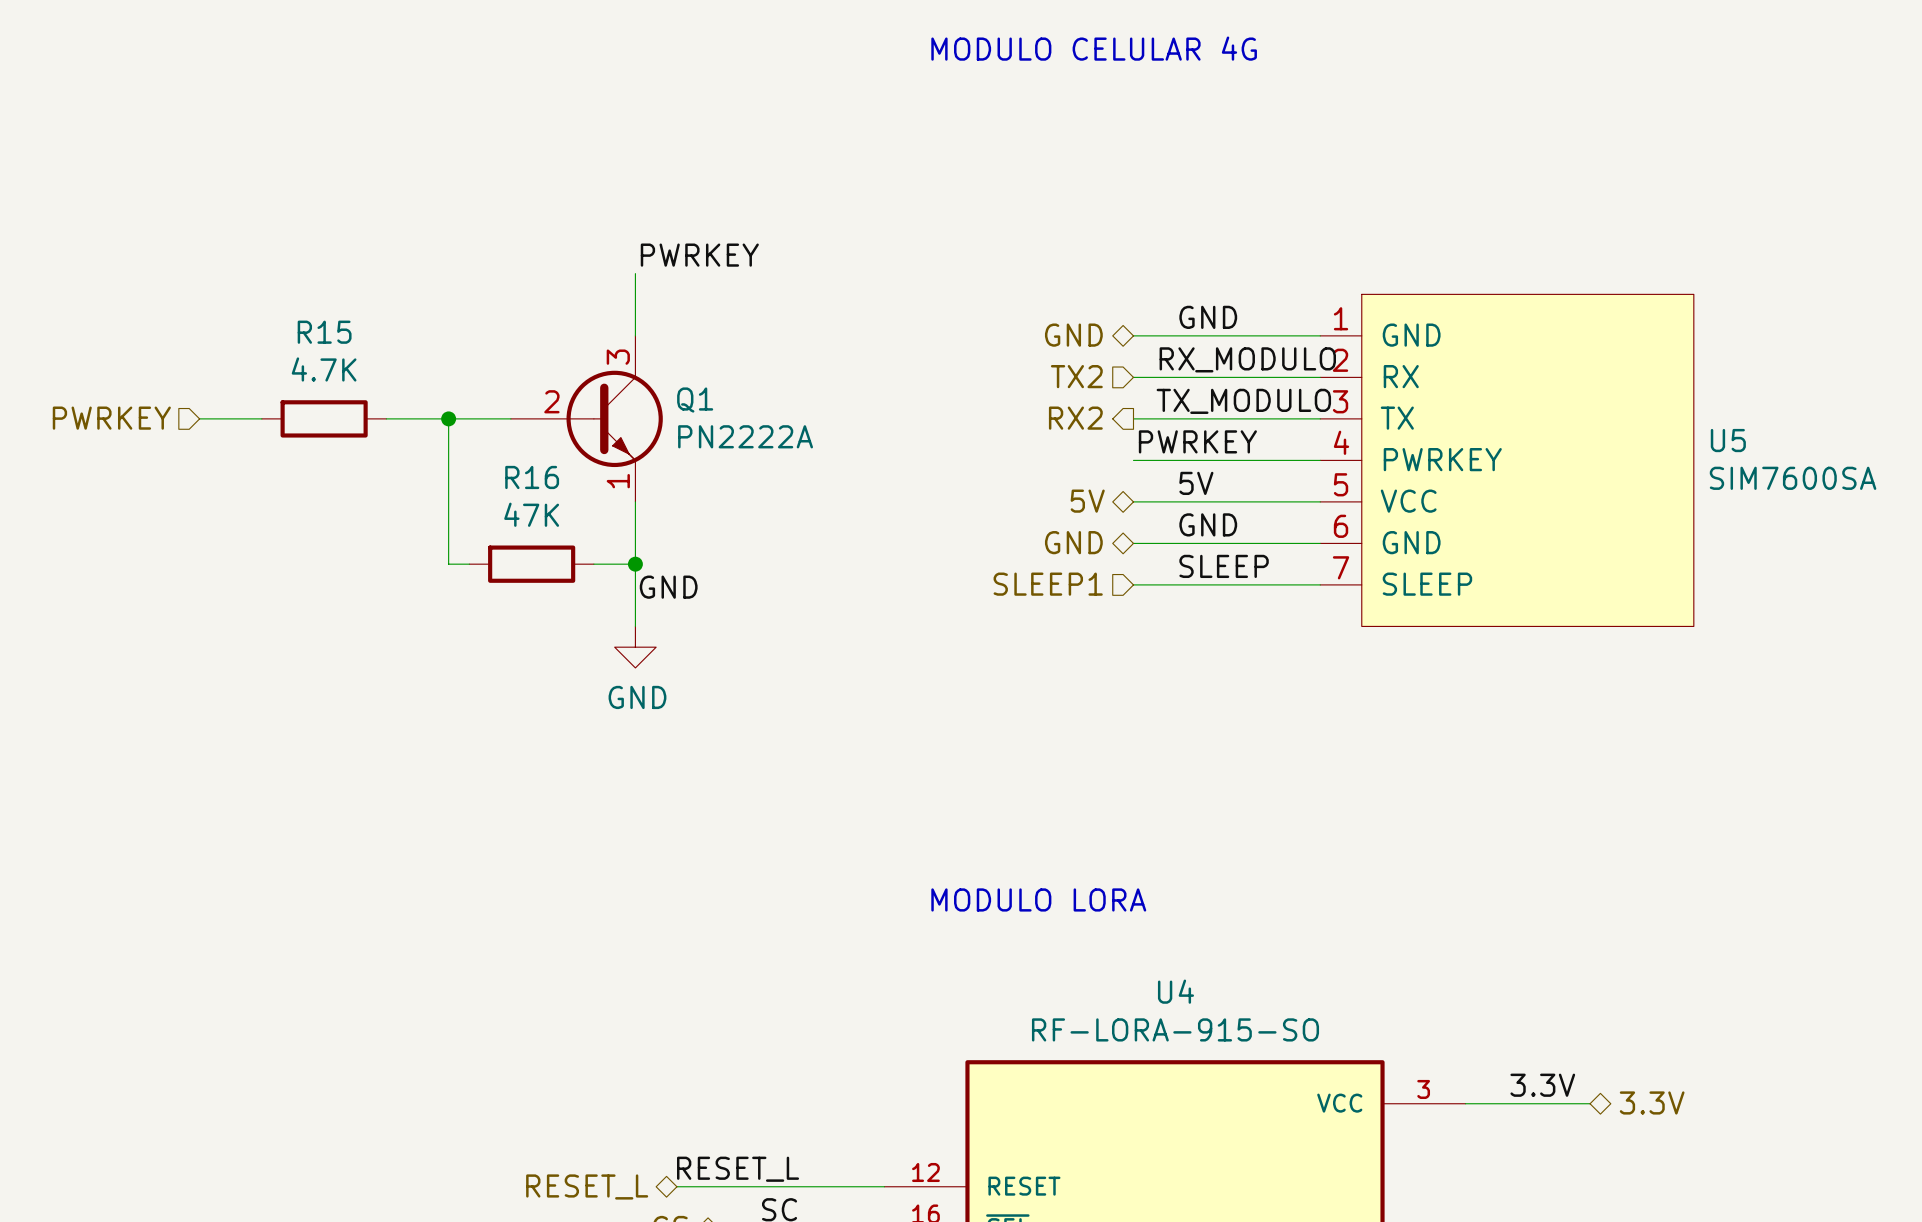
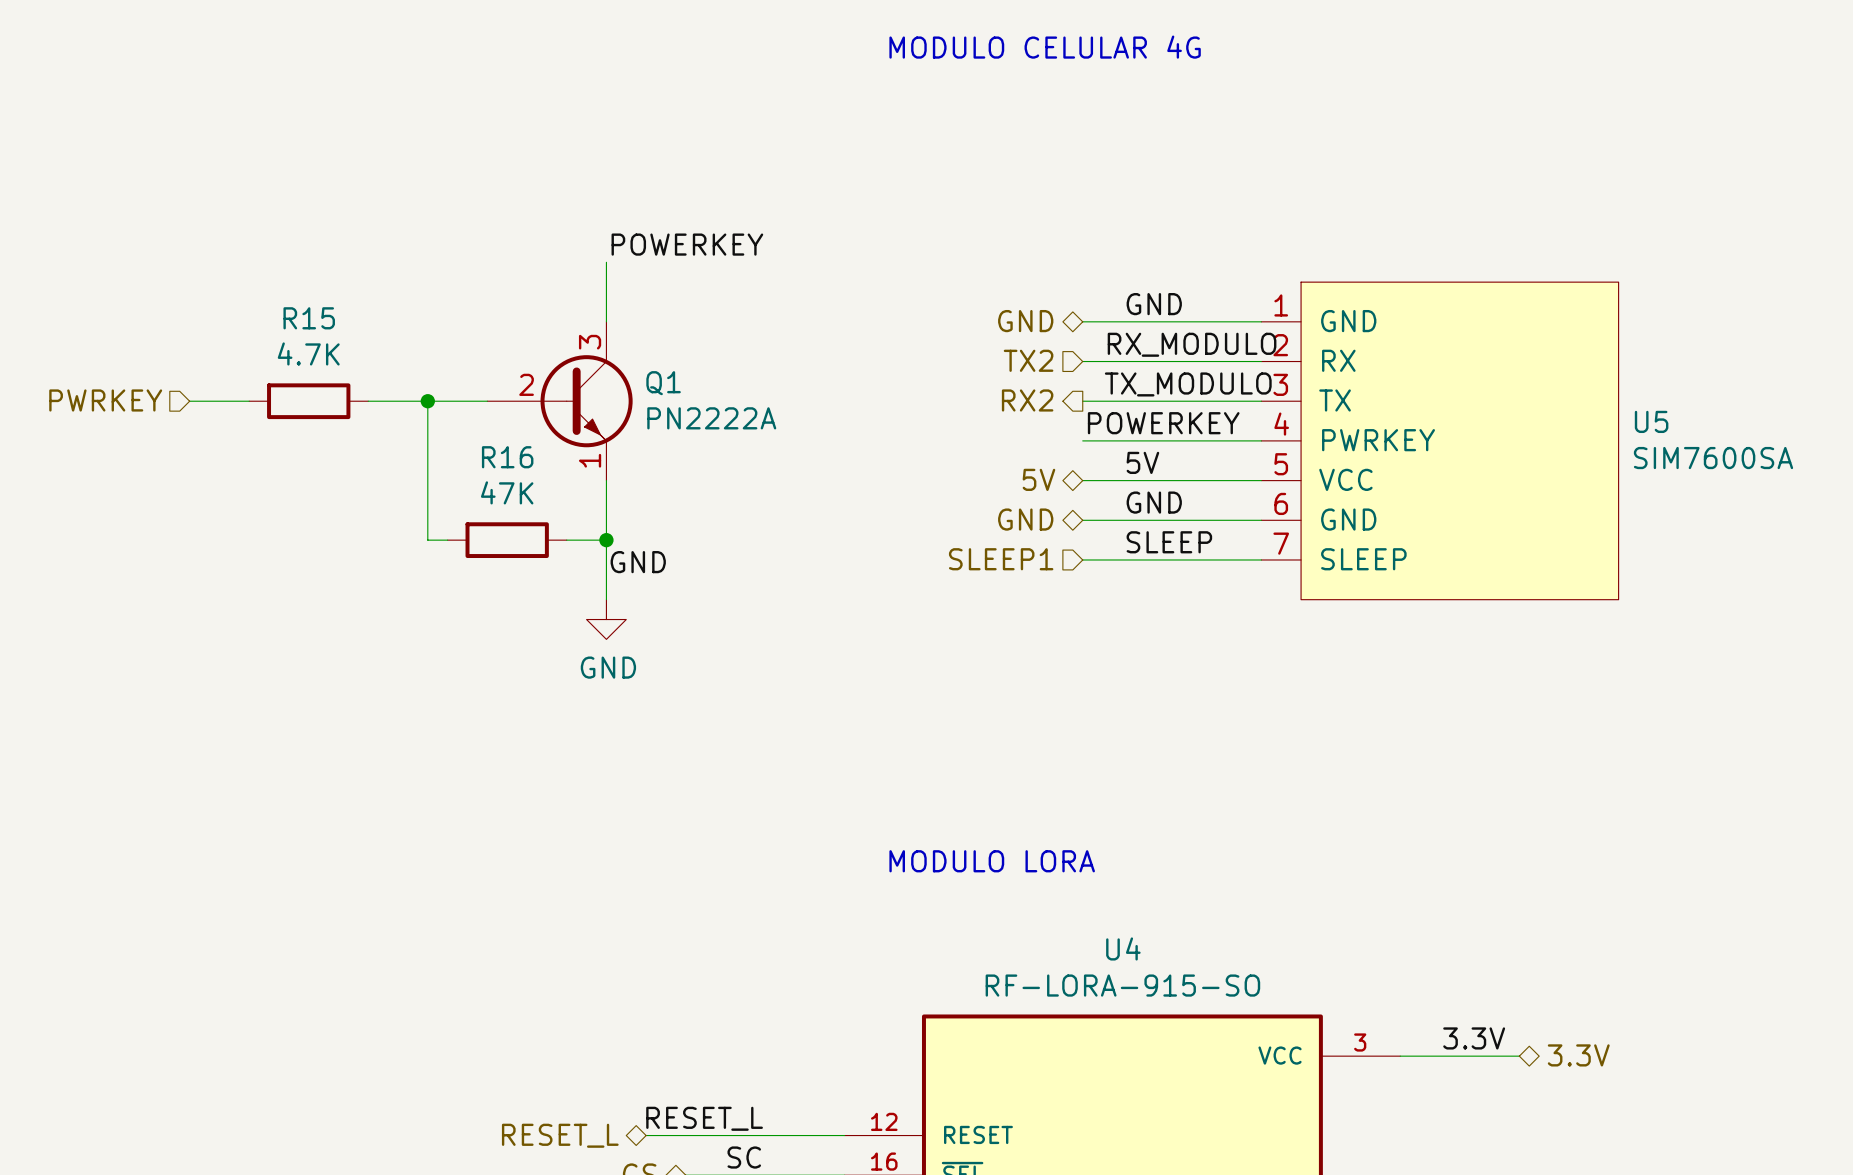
label: PWRKEY (699, 255) -> POWERKEY (687, 244)
label: PWRKEY (1197, 441) -> POWERKEY (1163, 423)

